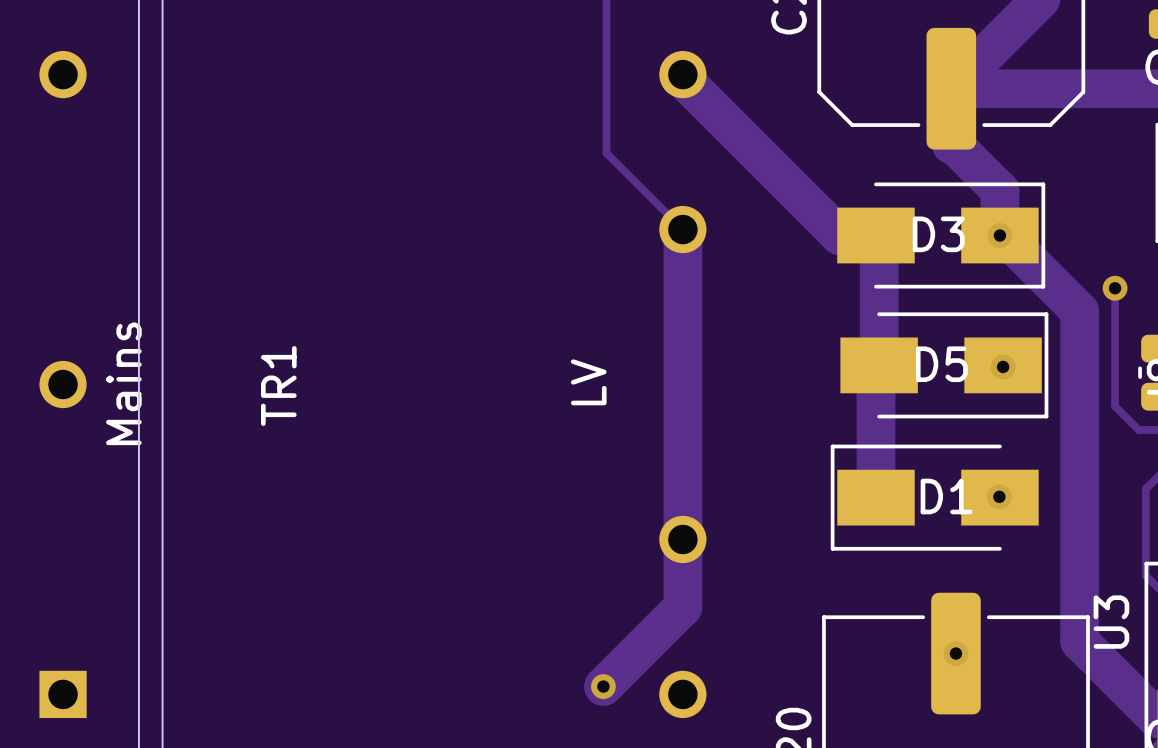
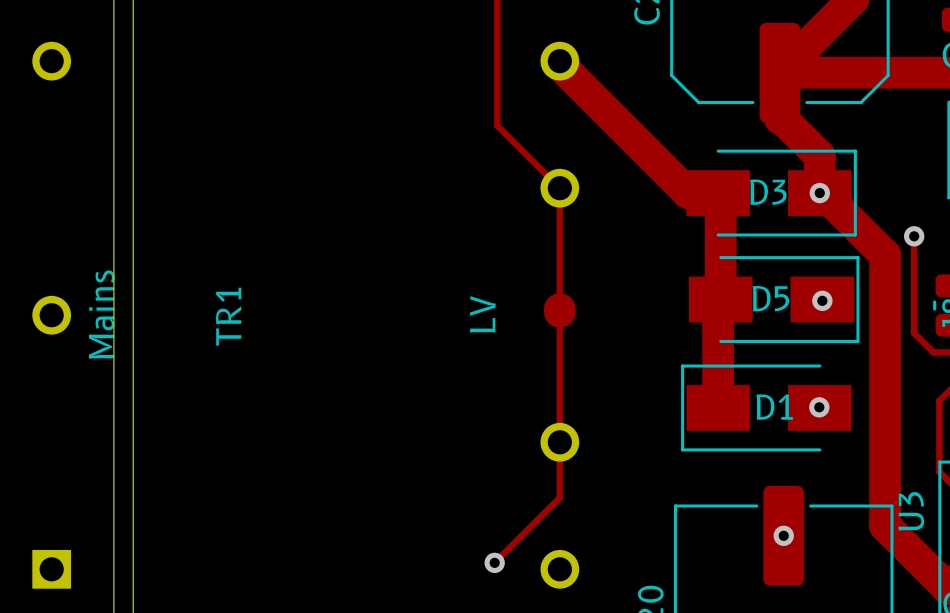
track width: thick (682, 229) (682, 377) -> thin (559, 188) (559, 309)
track width: thick (682, 380) (682, 607) (603, 686) -> thin (559, 311) (559, 497) (494, 562)

